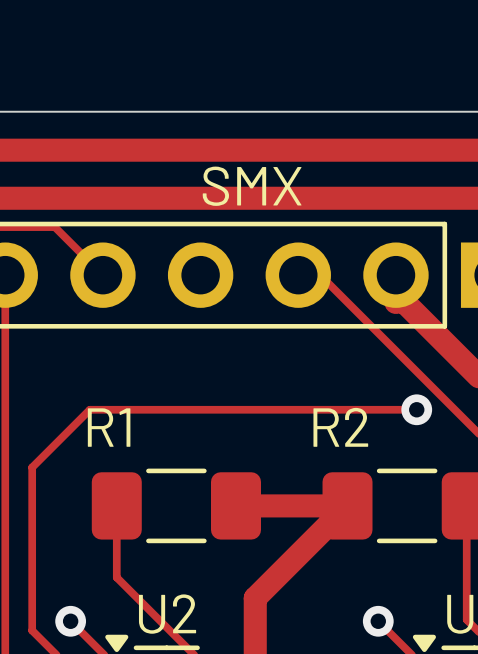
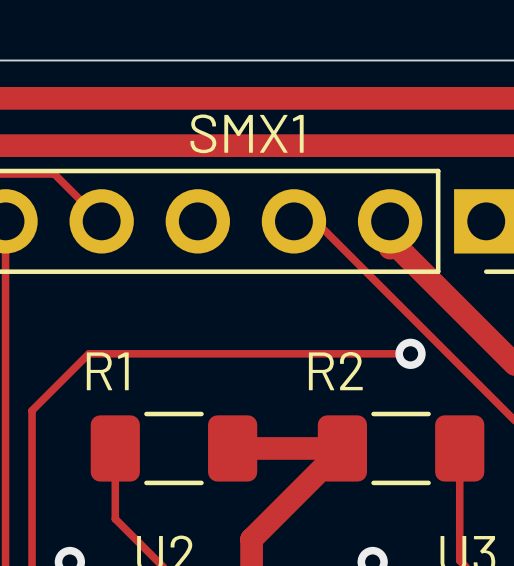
SMX name: SMX (252, 186) -> SMX1 (247, 133)

